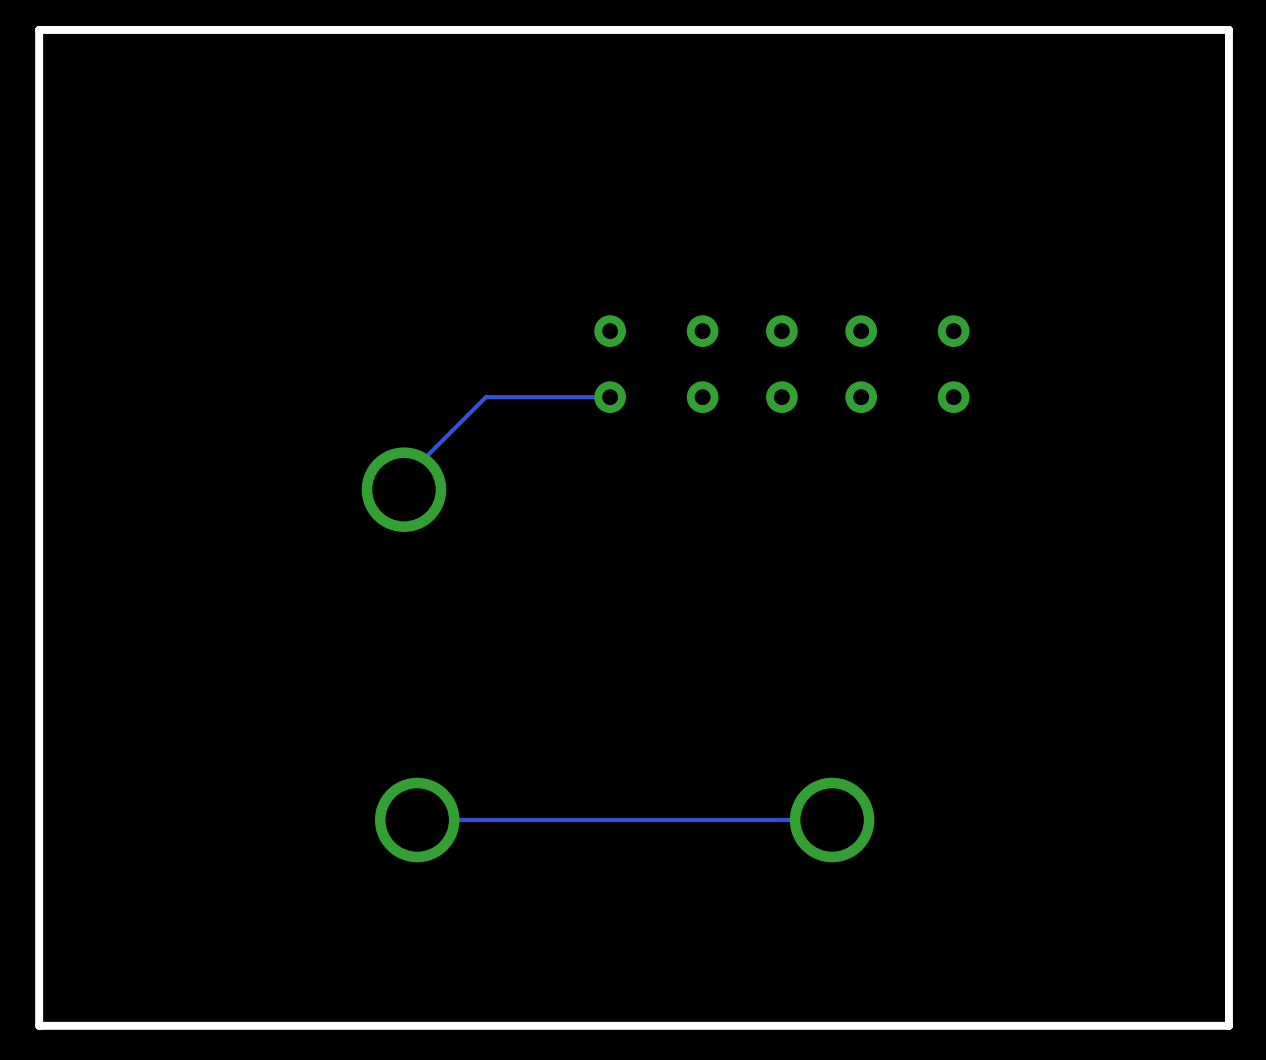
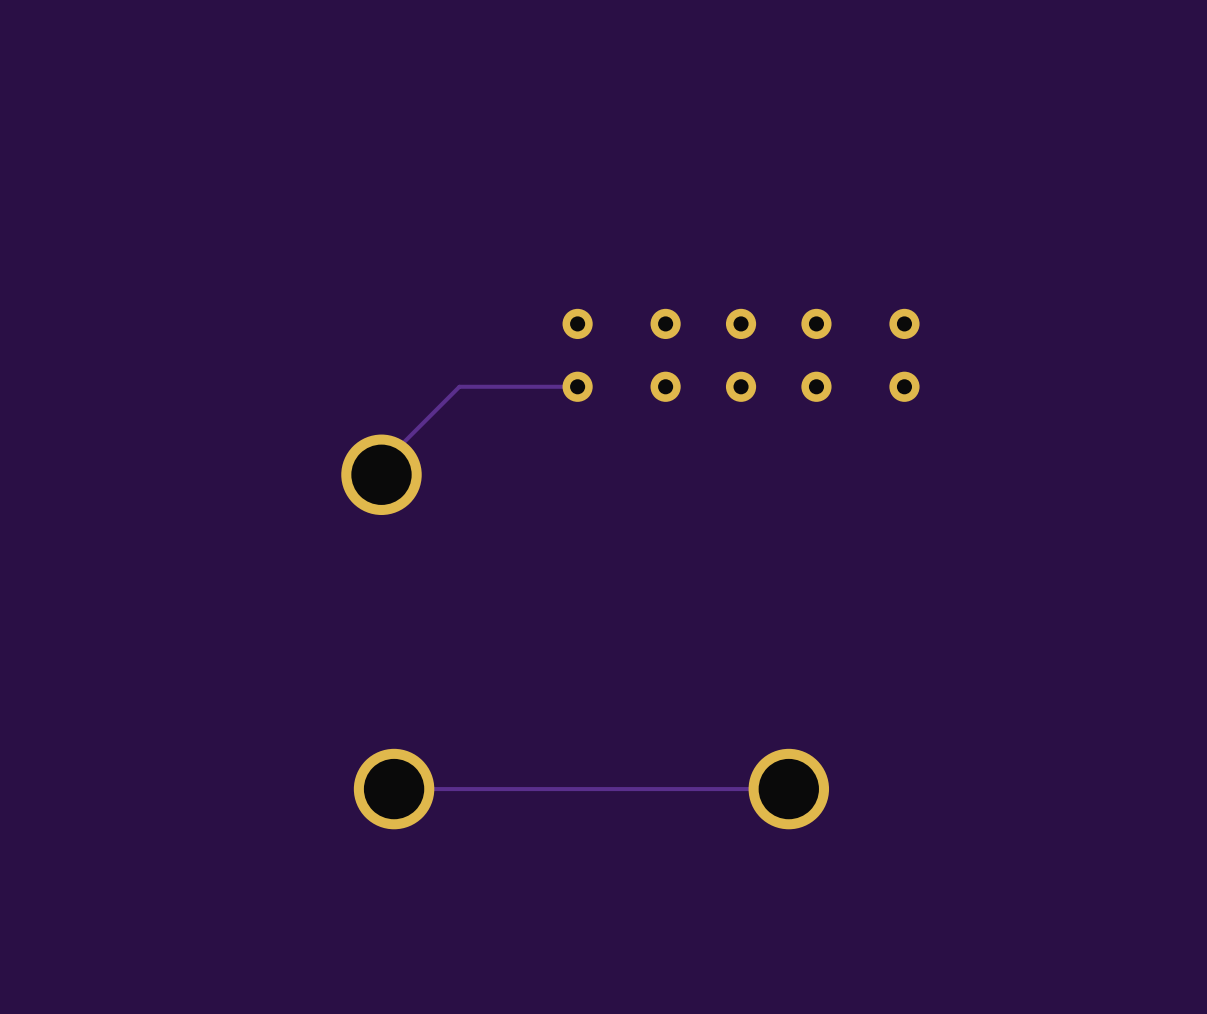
board edge: (1228, 29) (39, 29) (39, 1025) (1228, 1025) (1228, 29) -> none

